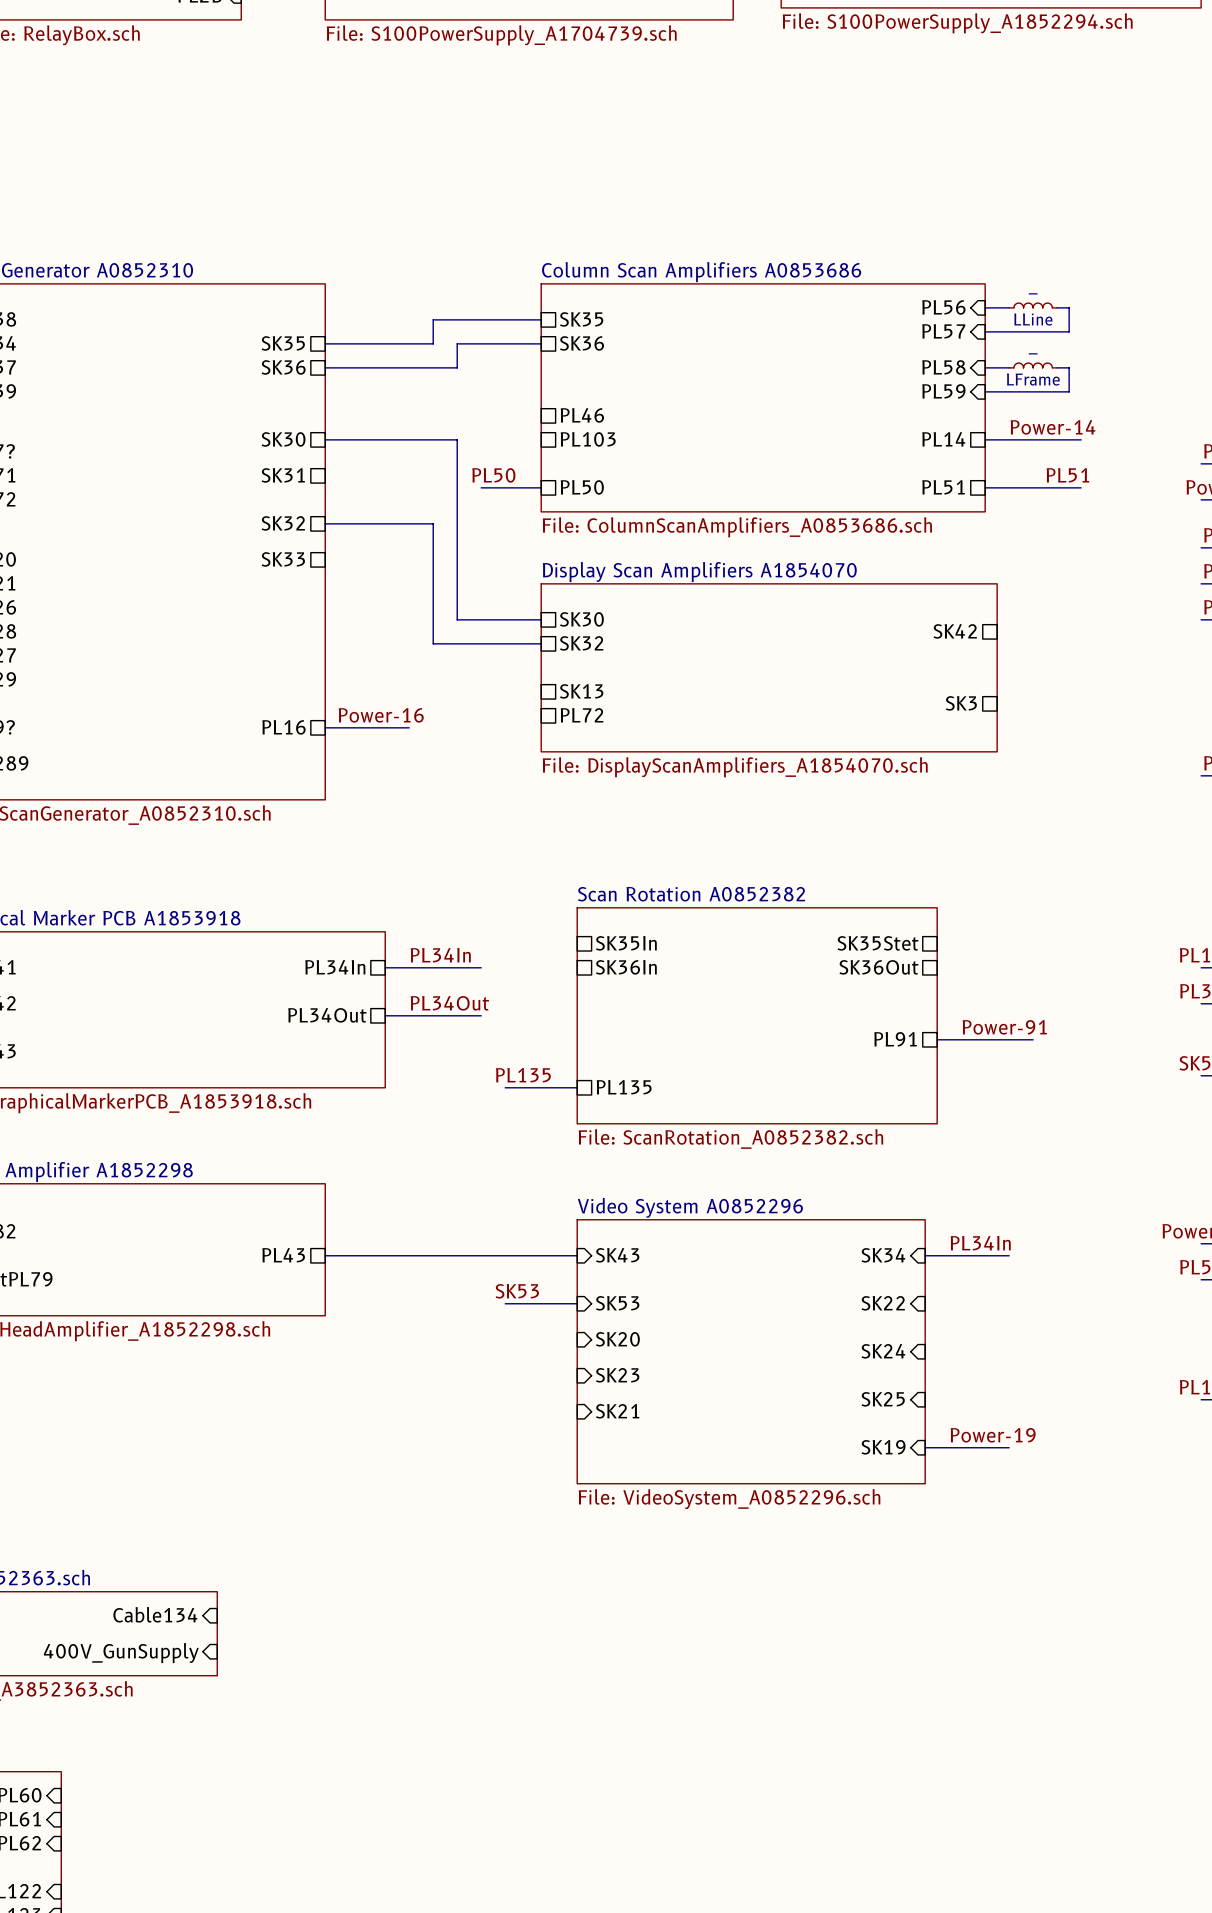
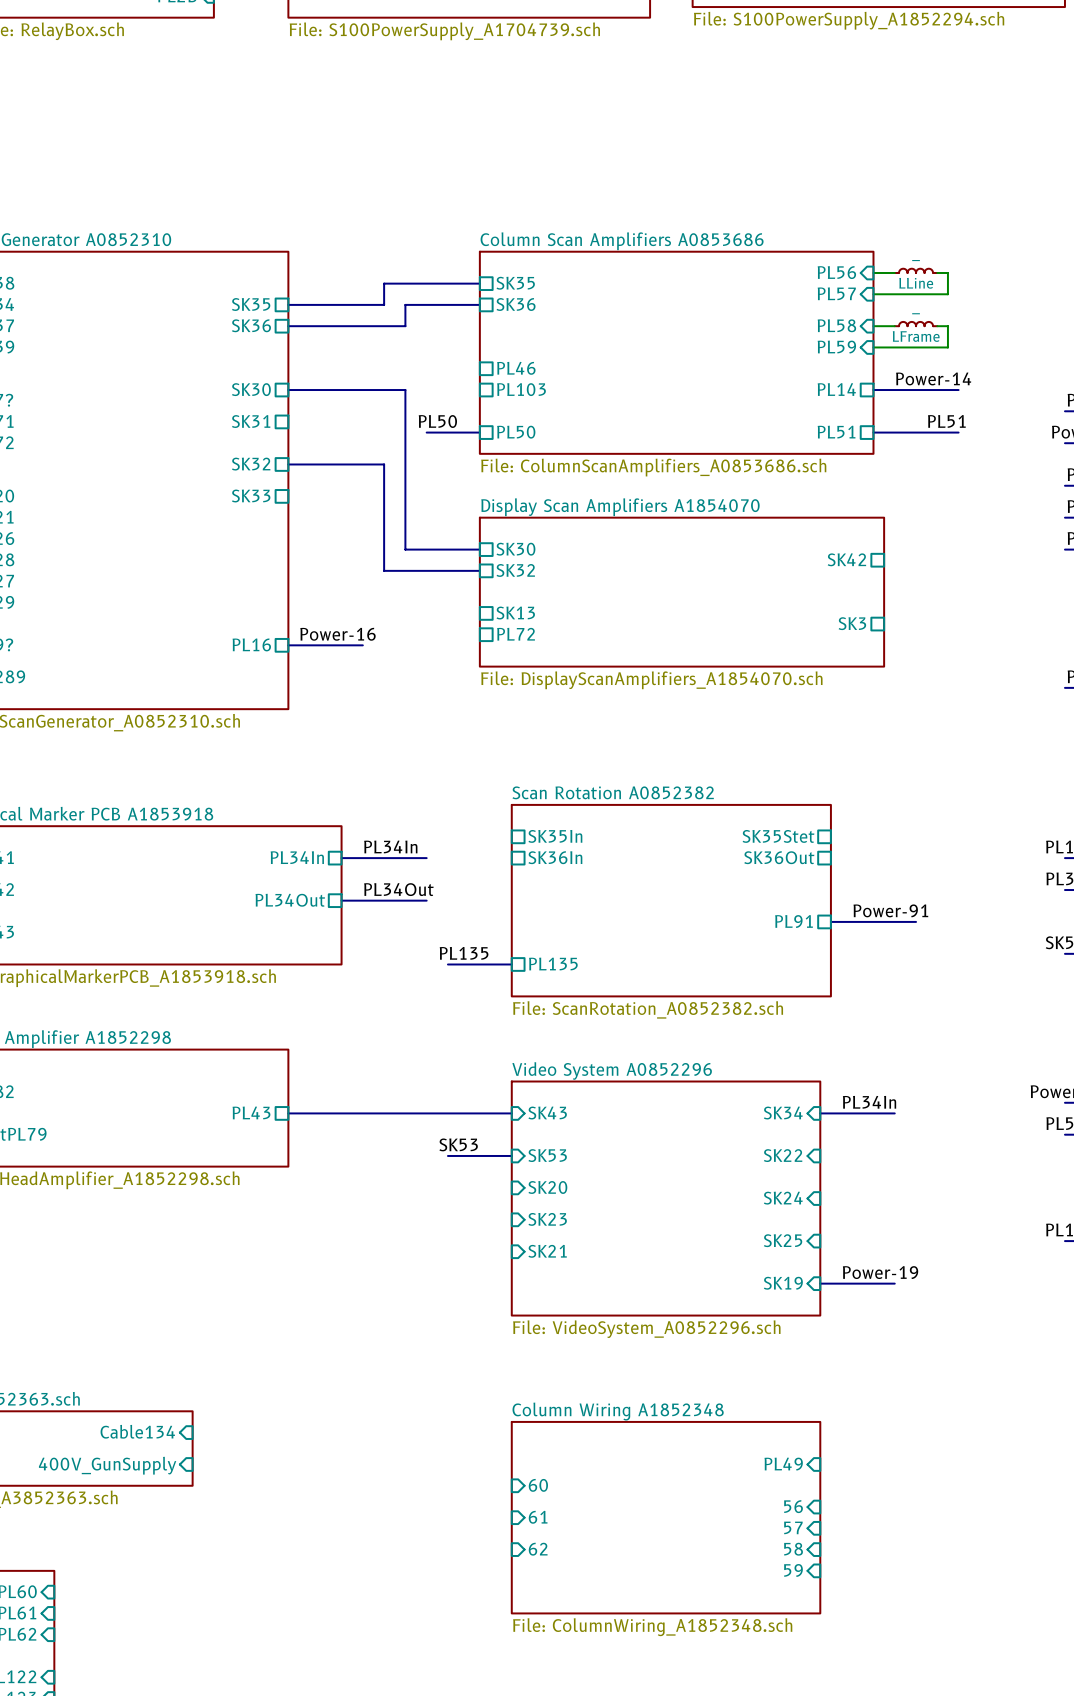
sheet pin: none -> PL49 (783, 1464)
sheet pin: none -> 60 (538, 1485)
sheet pin: none -> 56 (793, 1506)
sheet pin: none -> 61 (538, 1517)
sheet Column Wiring A1852348: none -> File: ColumnWiring_A1852348.sch (666, 1517)
sheet pin: none -> 57 (793, 1527)
sheet pin: none -> 62 (538, 1549)
sheet pin: none -> 58 (793, 1549)
sheet pin: none -> 59 (793, 1570)

